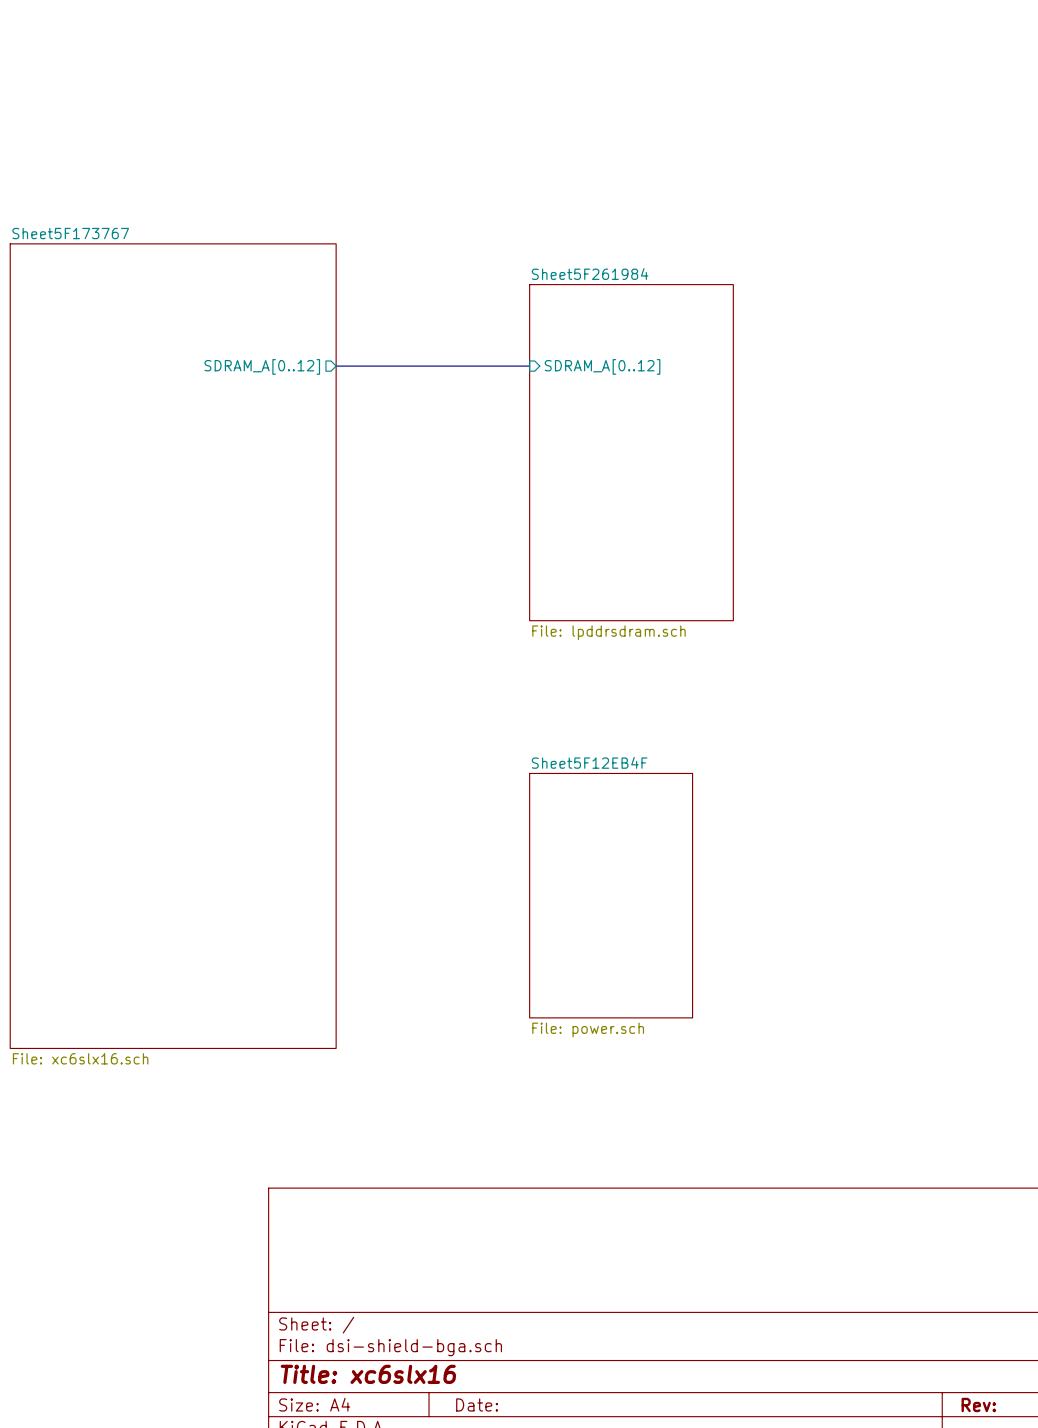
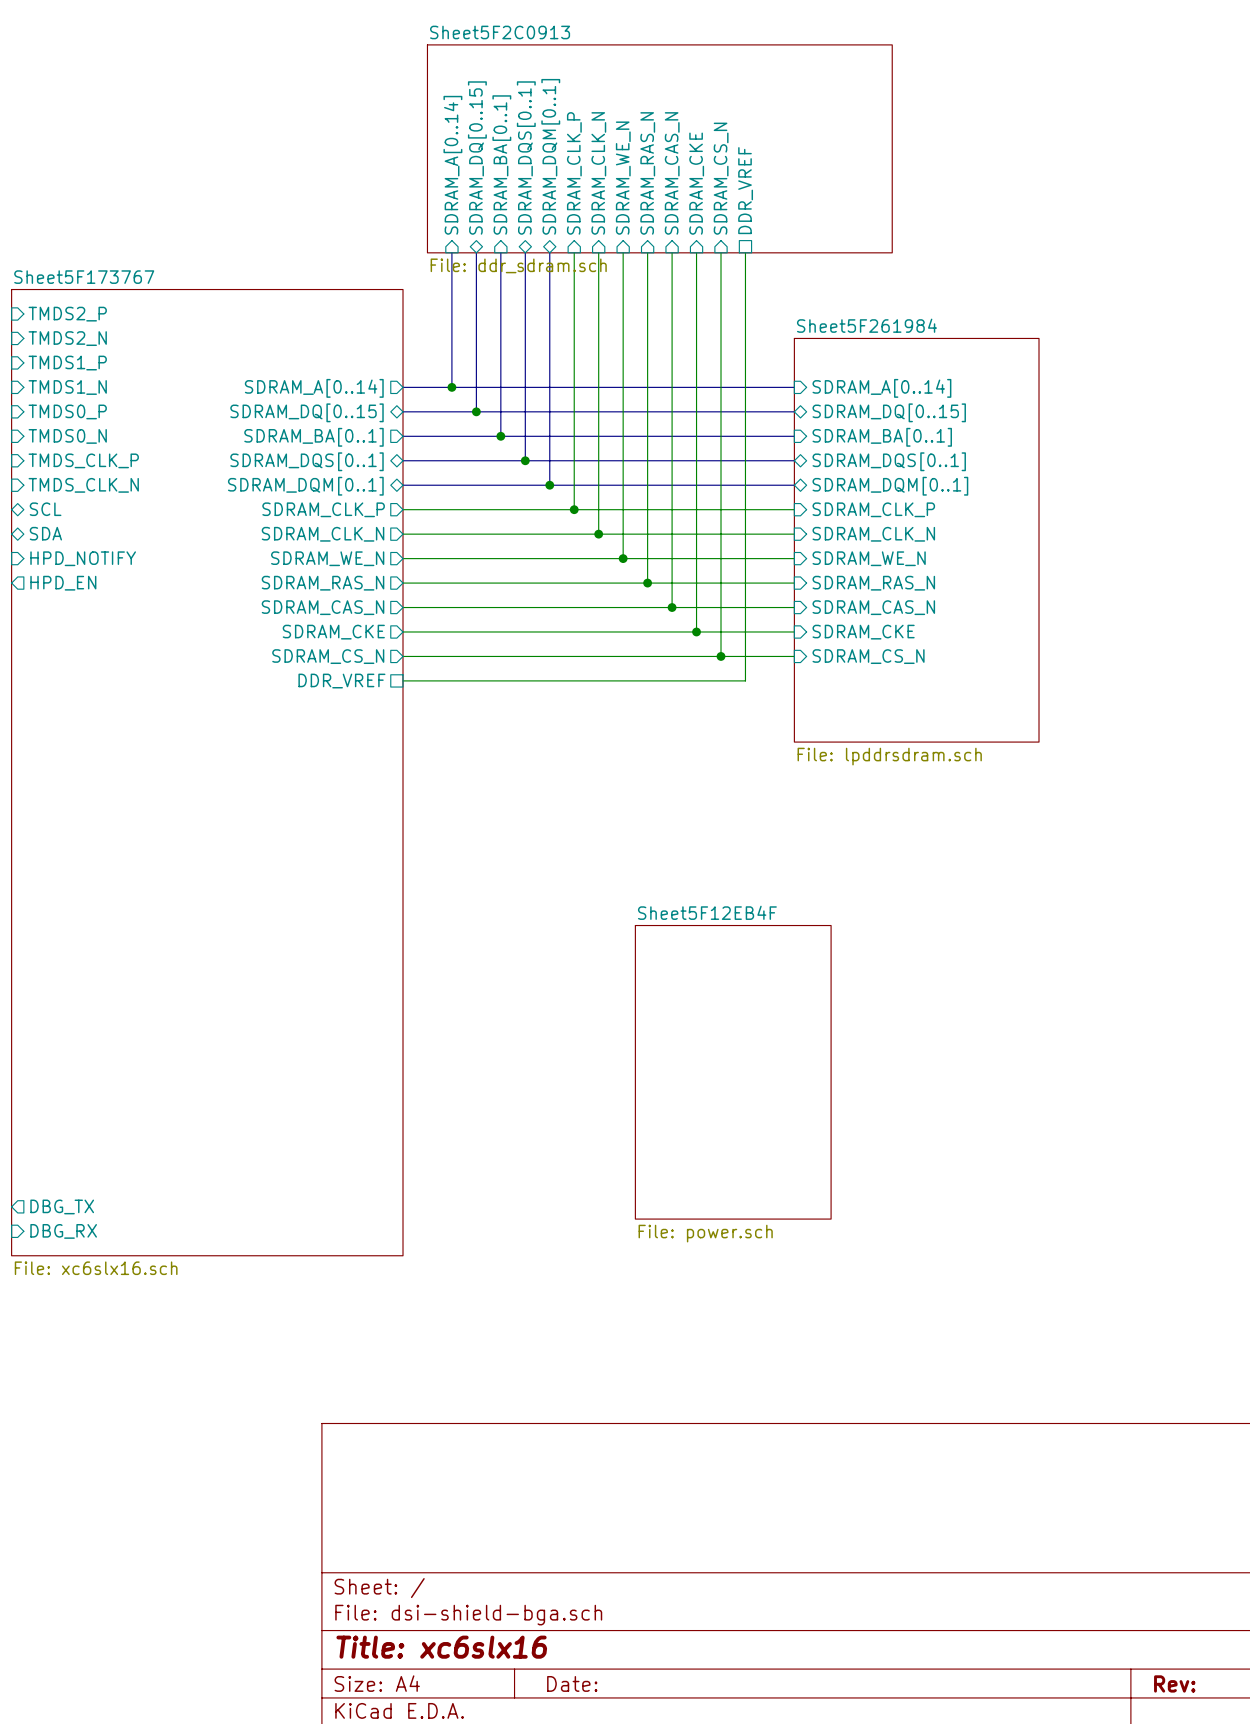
sheet Sheet5F2C0913: none -> File: ddr_sdram.sch (659, 148)
sheet pin: none -> SDRAM_DQM[0..1] (550, 156)
sheet pin: none -> SDRAM_DQ[0..15] (477, 158)
sheet pin: none -> SDRAM_DQS[0..1] (526, 158)
sheet pin: none -> SDRAM_A[0..14] (452, 165)
sheet pin: none -> SDRAM_BA[0..1] (501, 164)
sheet pin: none -> SDRAM_CLK_P (574, 173)
sheet pin: none -> SDRAM_CLK_N (598, 173)
sheet pin: none -> SDRAM_RAS_N (647, 173)
sheet pin: none -> SDRAM_CAS_N (672, 173)
sheet pin: none -> SDRAM_WE_N (623, 178)
sheet pin: none -> SDRAM_CS_N (721, 178)
sheet pin: none -> SDRAM_CKE (696, 183)
sheet pin: none -> DDR_VREF (745, 190)
bus: none -> (451, 252) (451, 387)
bus: none -> (476, 252) (476, 411)
bus: none -> (500, 252) (500, 436)
bus: none -> (525, 252) (525, 460)
bus: none -> (549, 252) (549, 485)
wire: none -> (574, 252) (574, 509)
wire: none -> (598, 252) (598, 534)
wire: none -> (623, 252) (623, 558)
wire: none -> (647, 252) (647, 583)
wire: none -> (672, 252) (672, 607)
wire: none -> (696, 252) (696, 631)
wire: none -> (721, 252) (721, 656)
wire: none -> (745, 252) (745, 680) (403, 680)
sheet pin: none -> TMDS2_P (67, 314)
sheet pin: none -> TMDS2_N (67, 338)
sheet pin: none -> TMDS1_P (67, 363)
sheet pin: none -> TMDS1_N (67, 387)
bus: none -> (403, 387) (794, 387)
junction: none -> (451, 387)
sheet pin: none -> SDRAM_A[0..14] (314, 388)
sheet pin: none -> SDRAM_A[0..14] (881, 388)
sheet pin: none -> TMDS0_P (67, 411)
bus: none -> (403, 411) (794, 411)
junction: none -> (476, 411)
sheet pin: none -> SDRAM_DQ[0..15] (307, 412)
sheet pin: none -> SDRAM_DQ[0..15] (889, 412)
sheet pin: none -> TMDS0_N (67, 436)
sheet pin: SDRAM_A[0..12] (262, 366) -> SDRAM_BA[0..1] (313, 437)
junction: none -> (500, 436)
bus: none -> (635, 436) (794, 436)
sheet pin: SDRAM_A[0..12] (602, 366) -> none
sheet pin: none -> SDRAM_BA[0..1] (882, 437)
sheet pin: none -> TMDS_CLK_P (83, 460)
bus: none -> (403, 460) (794, 460)
junction: none -> (525, 460)
sheet pin: none -> SDRAM_DQS[0..1] (307, 461)
sheet pin: none -> SDRAM_DQS[0..1] (889, 461)
sheet pin: none -> TMDS_CLK_N (83, 485)
bus: none -> (403, 485) (794, 485)
junction: none -> (549, 485)
sheet pin: none -> SDRAM_DQM[0..1] (305, 486)
sheet pin: none -> SDRAM_DQM[0..1] (890, 486)
sheet pin: none -> SCL (45, 509)
sheet pin: none -> SDRAM_CLK_P (323, 509)
wire: none -> (403, 509) (794, 509)
junction: none -> (574, 509)
sheet pin: none -> SDRAM_CLK_P (873, 509)
sheet pin: none -> SDA (45, 533)
sheet pin: none -> SDRAM_CLK_N (323, 534)
wire: none -> (403, 534) (794, 534)
junction: none -> (598, 534)
sheet pin: none -> SDRAM_CLK_N (873, 534)
sheet Sheet5F261984 position: (631, 452) -> (916, 540)
wire: none -> (403, 558) (794, 558)
junction: none -> (623, 558)
sheet pin: none -> HPD_NOTIFY (83, 558)
sheet pin: none -> SDRAM_WE_N (327, 558)
sheet pin: none -> SDRAM_WE_N (869, 558)
sheet pin: none -> HPD_EN (63, 583)
sheet pin: none -> SDRAM_RAS_N (323, 583)
wire: none -> (403, 583) (794, 583)
junction: none -> (647, 583)
sheet pin: none -> SDRAM_RAS_N (873, 583)
sheet pin: none -> SDRAM_CAS_N (323, 607)
wire: none -> (403, 607) (794, 607)
junction: none -> (672, 607)
sheet pin: none -> SDRAM_CAS_N (873, 607)
sheet pin: none -> SDRAM_CKE (333, 632)
wire: none -> (403, 631) (794, 631)
junction: none -> (696, 631)
sheet pin: none -> SDRAM_CKE (863, 632)
sheet pin: none -> SDRAM_CS_N (328, 656)
wire: none -> (403, 656) (794, 656)
junction: none -> (721, 656)
sheet pin: none -> SDRAM_CS_N (868, 656)
sheet pin: none -> DDR_VREF (341, 681)
sheet pin: none -> DBG_TX (62, 1206)
sheet pin: none -> DBG_RX (63, 1231)

